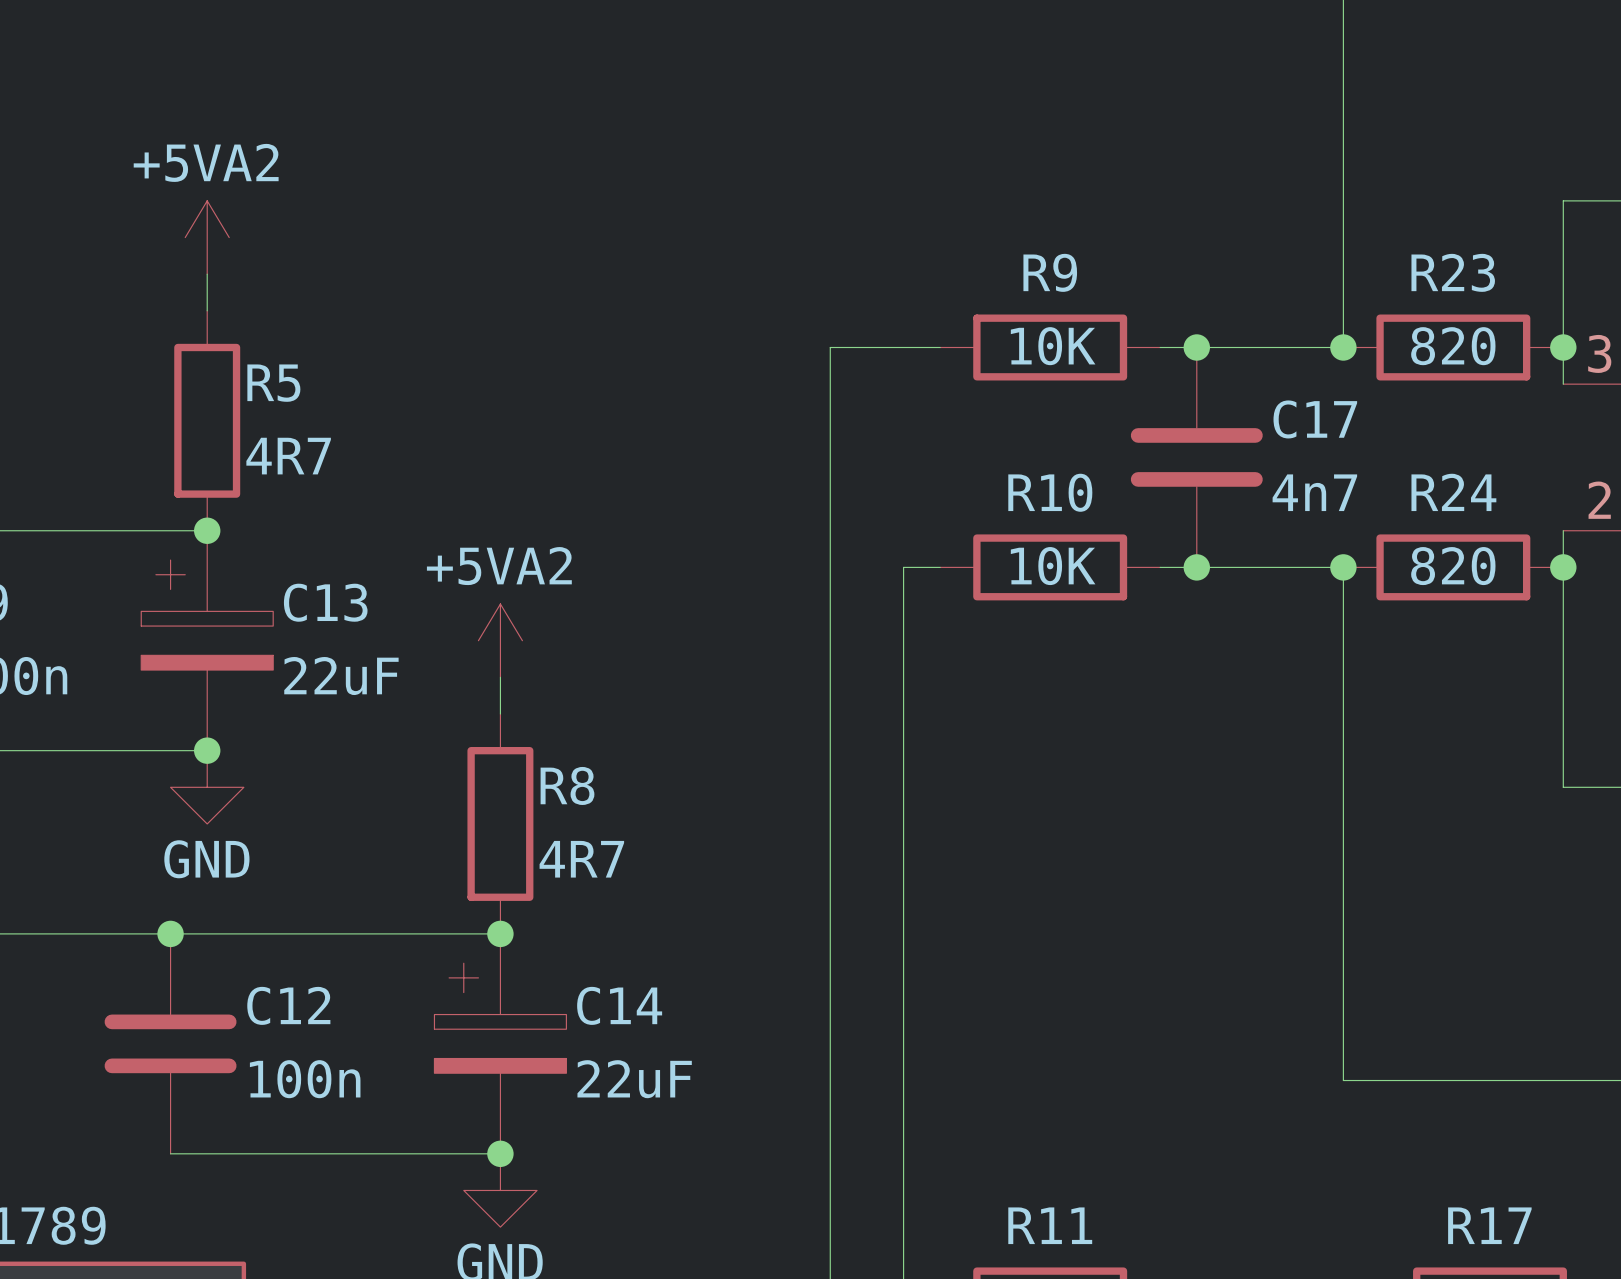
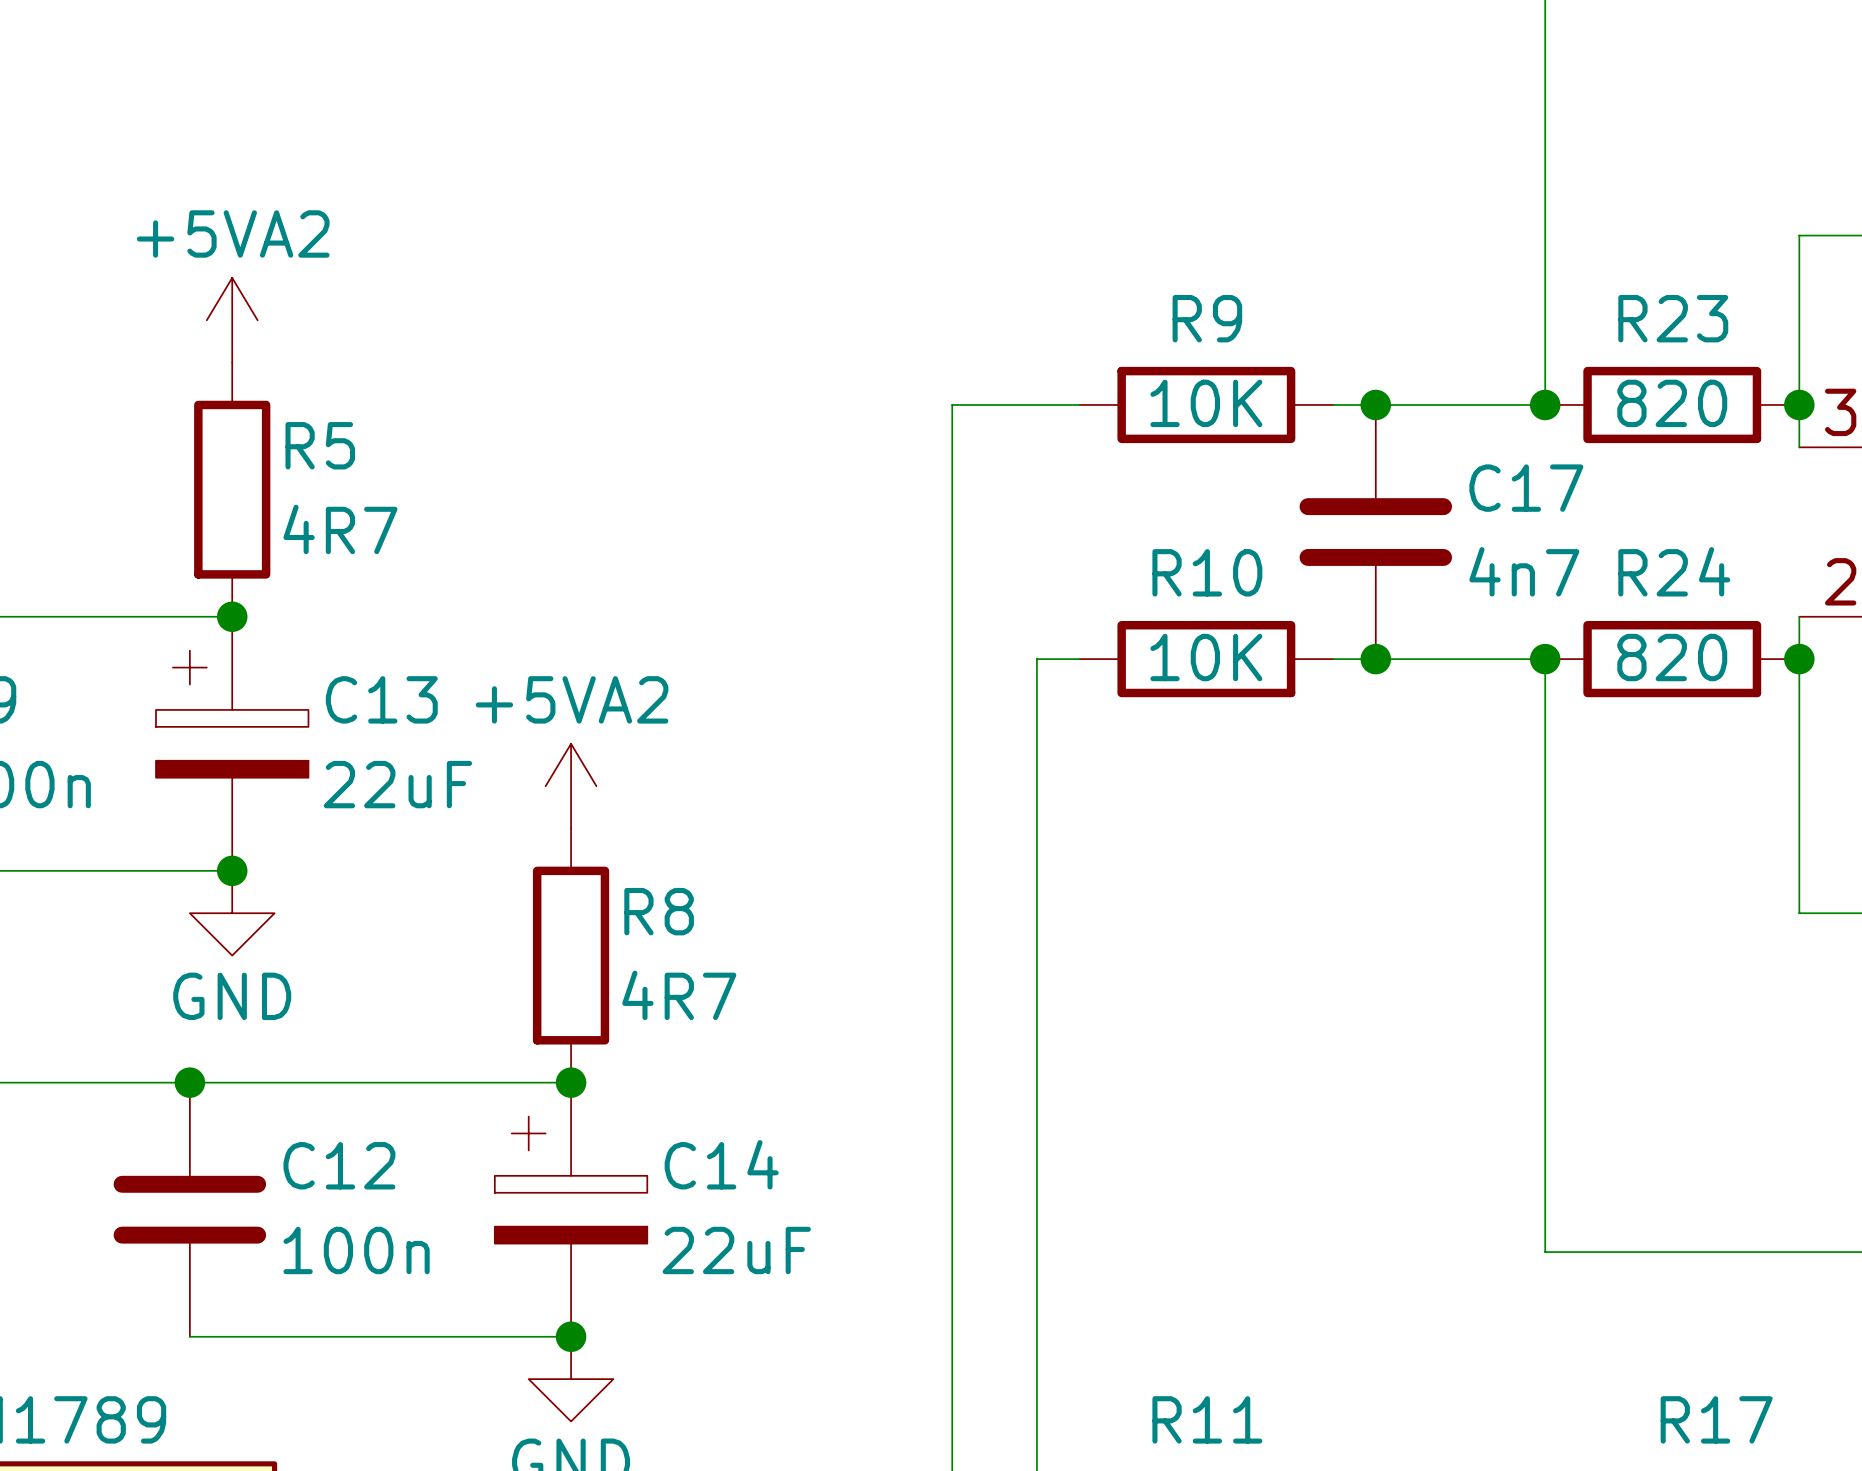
power symbol position: +5VA2 (207, 237) -> +5VA2 (232, 320)
power symbol position: +5VA2 (500, 640) -> +5VA2 (571, 786)

